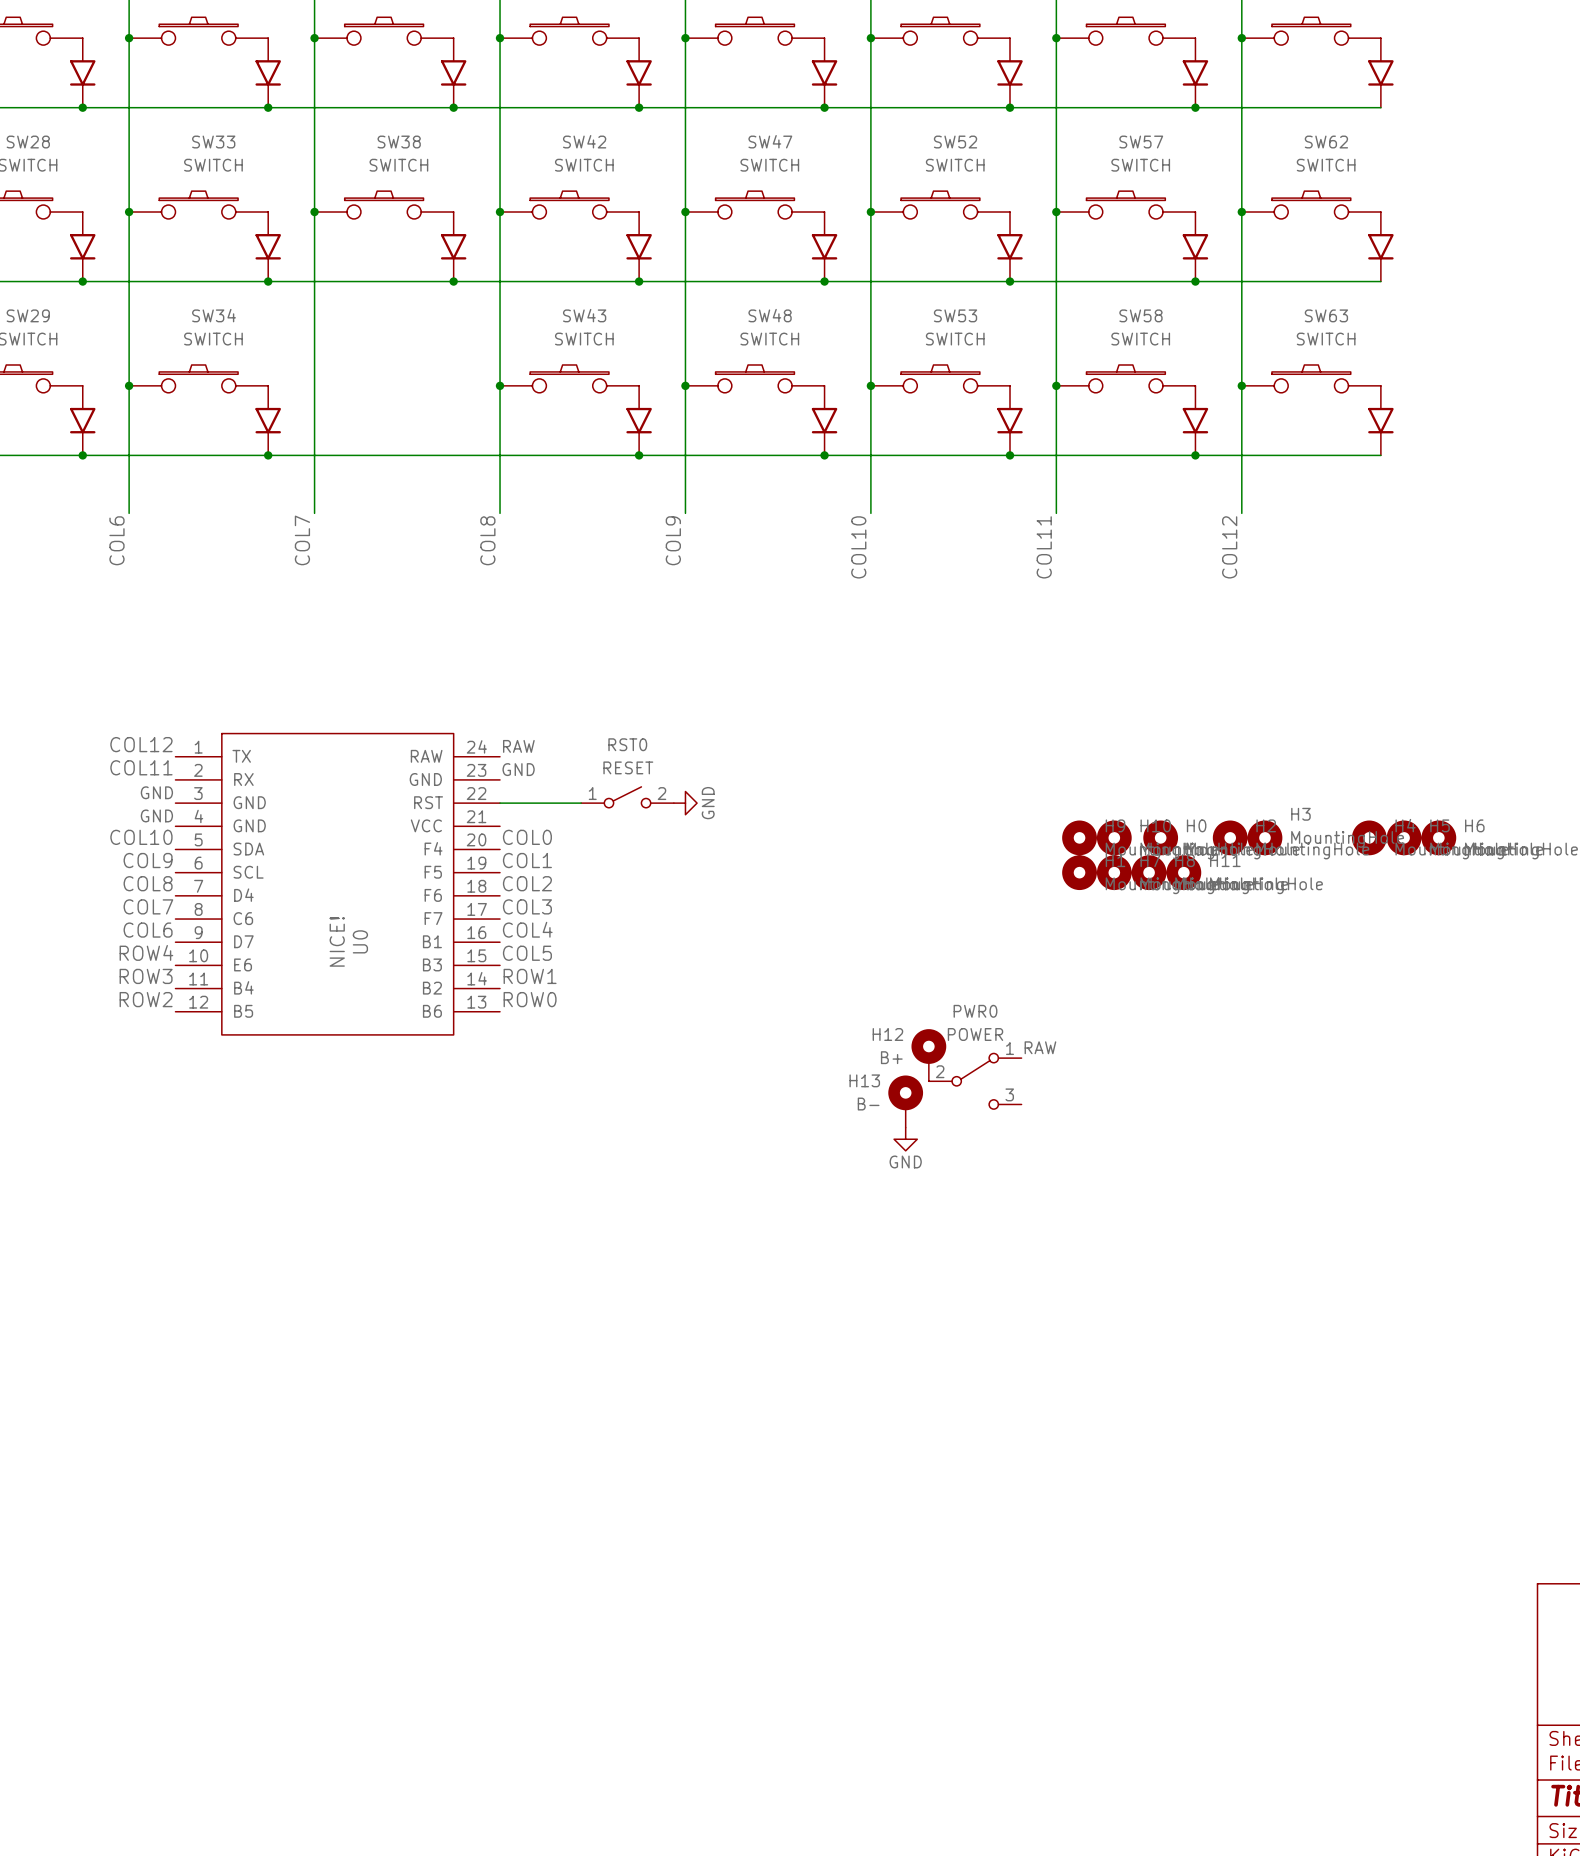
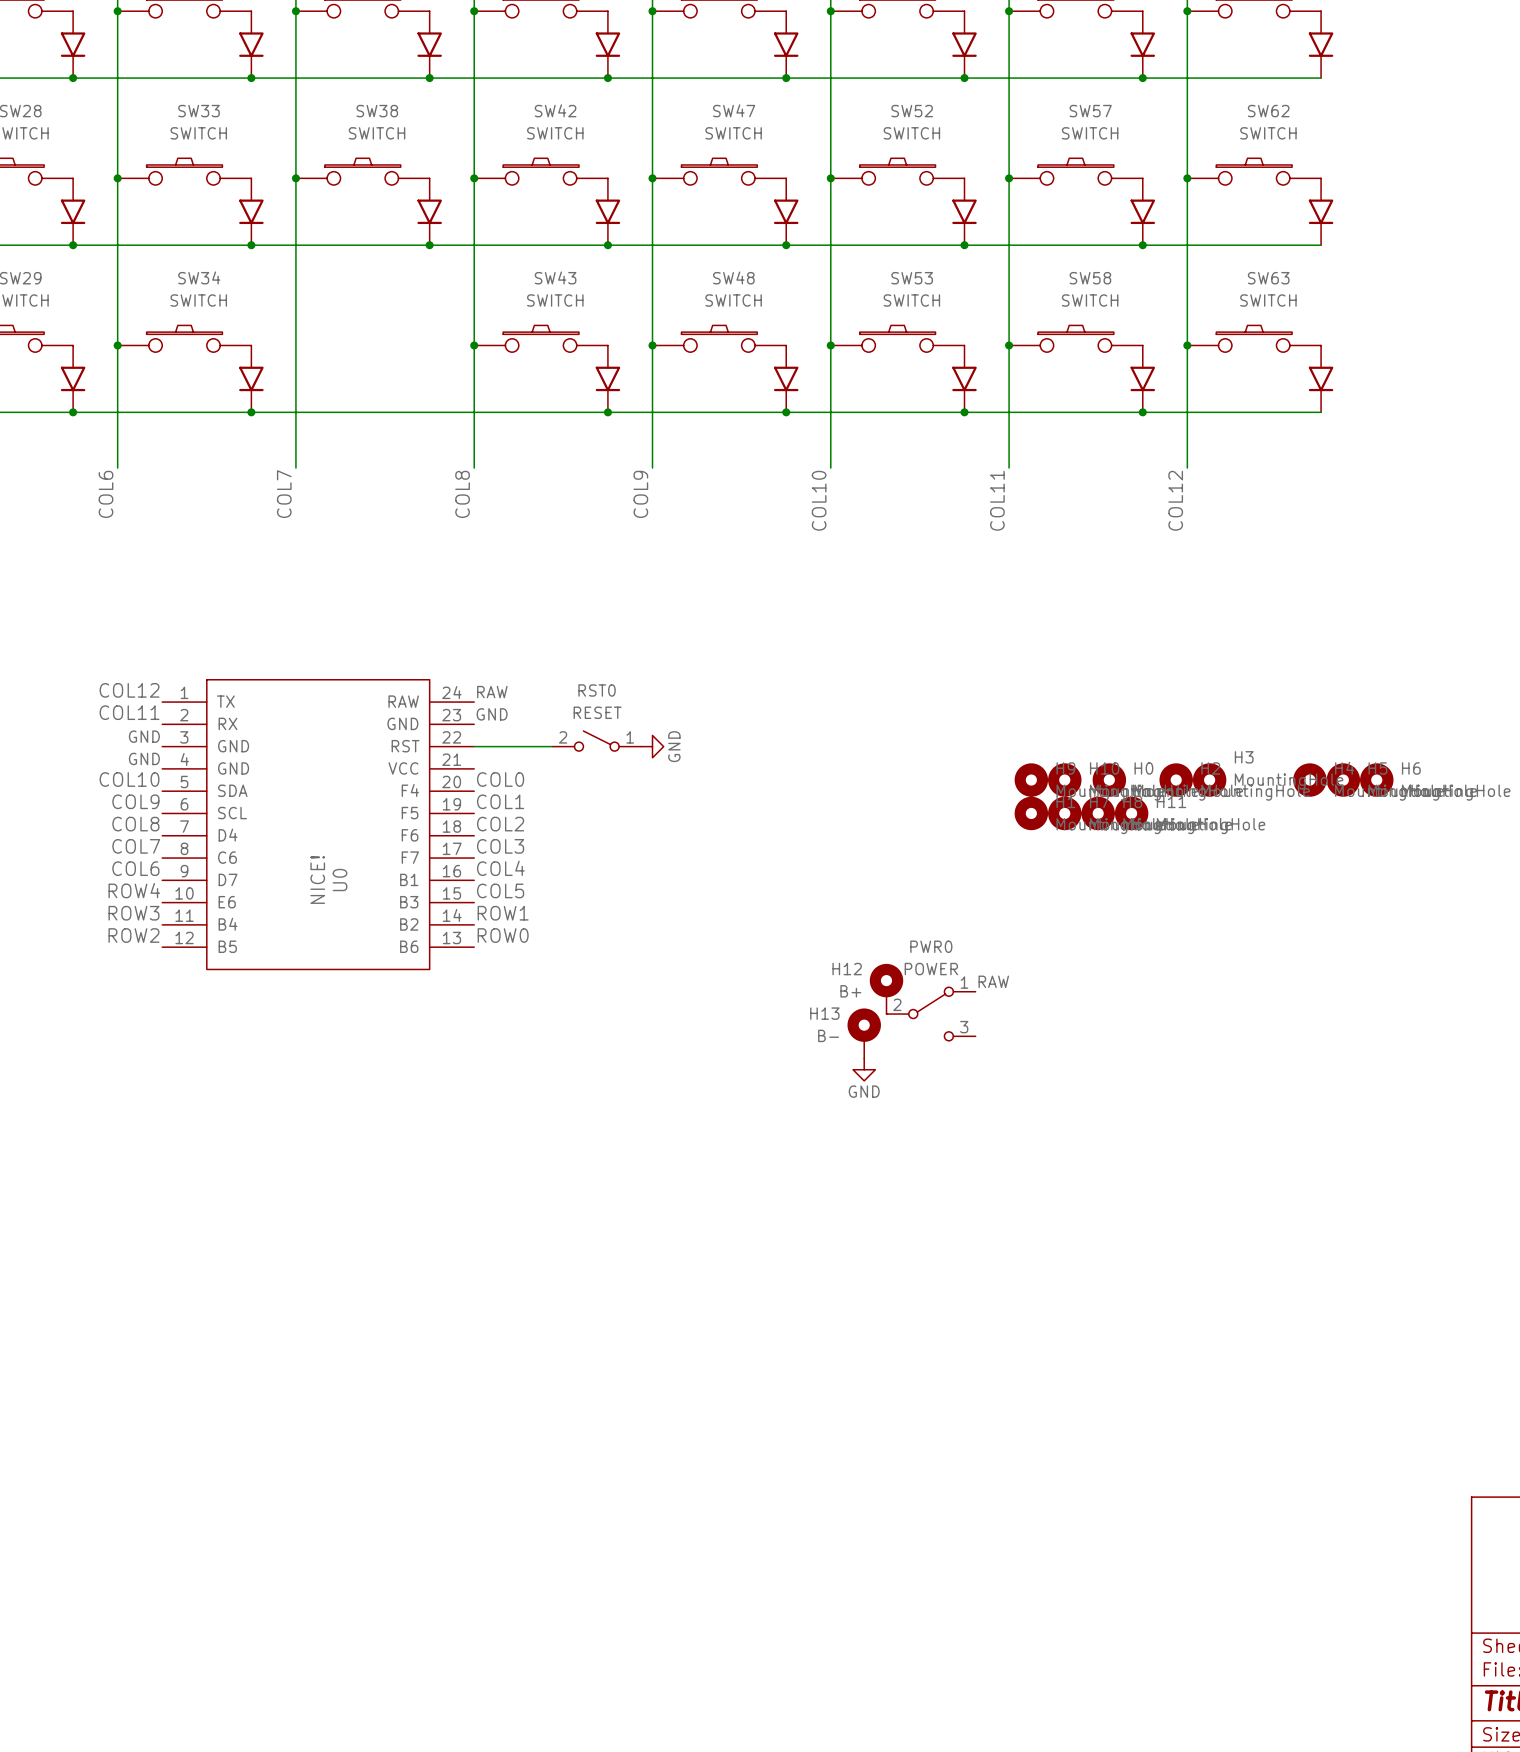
RST0 flip: as is (627, 797) -> left-right (596, 741)

